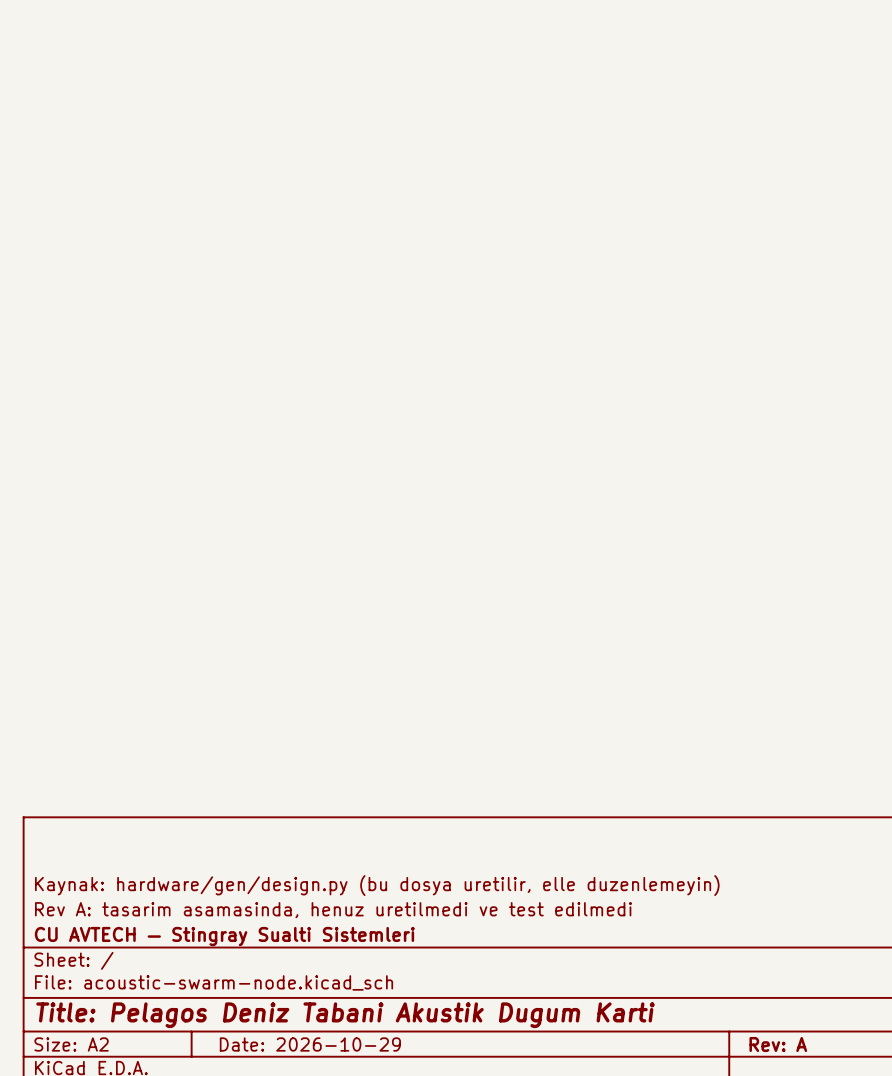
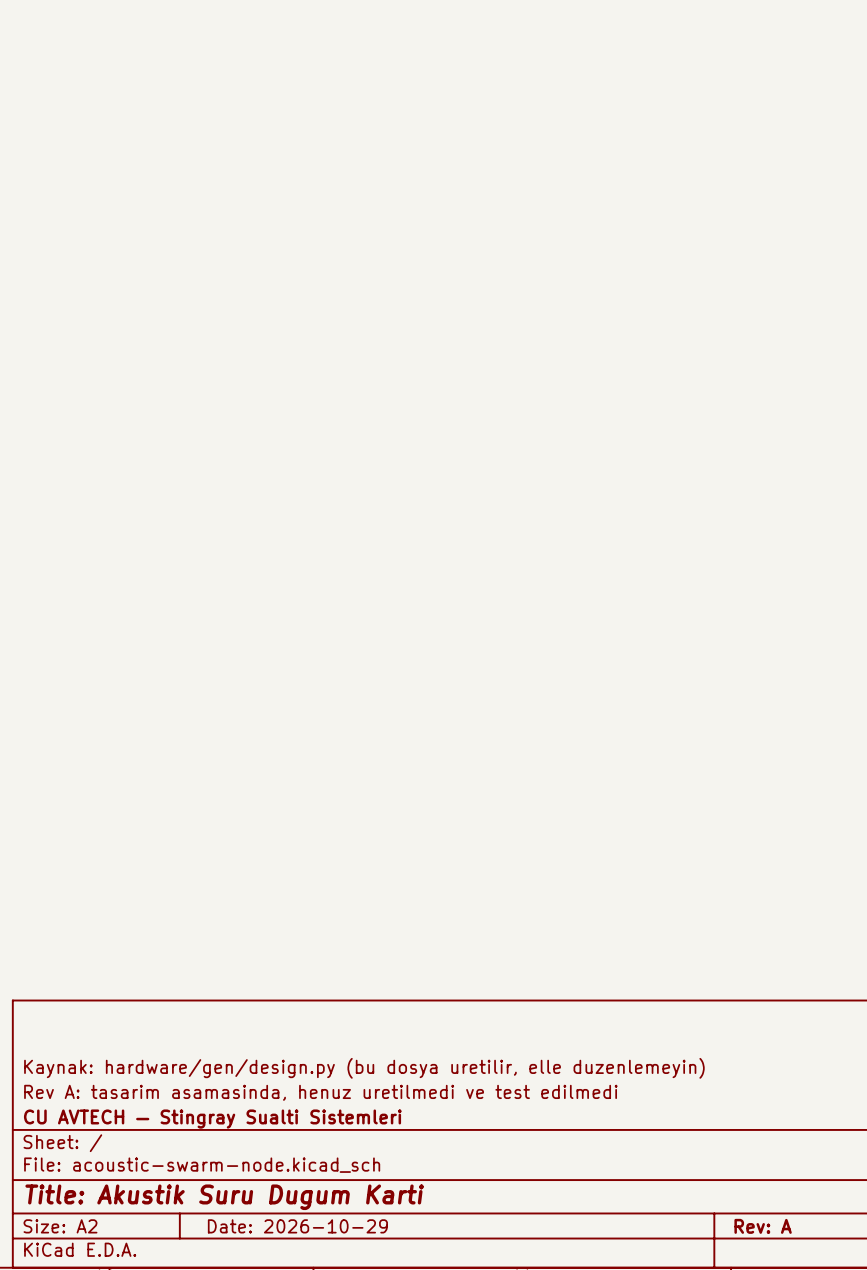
title block: Title: Pelagos Deniz Tabani Akustik Dugum Karti (345, 1015) -> Title: Akustik Suru Dugum Karti (224, 1197)

